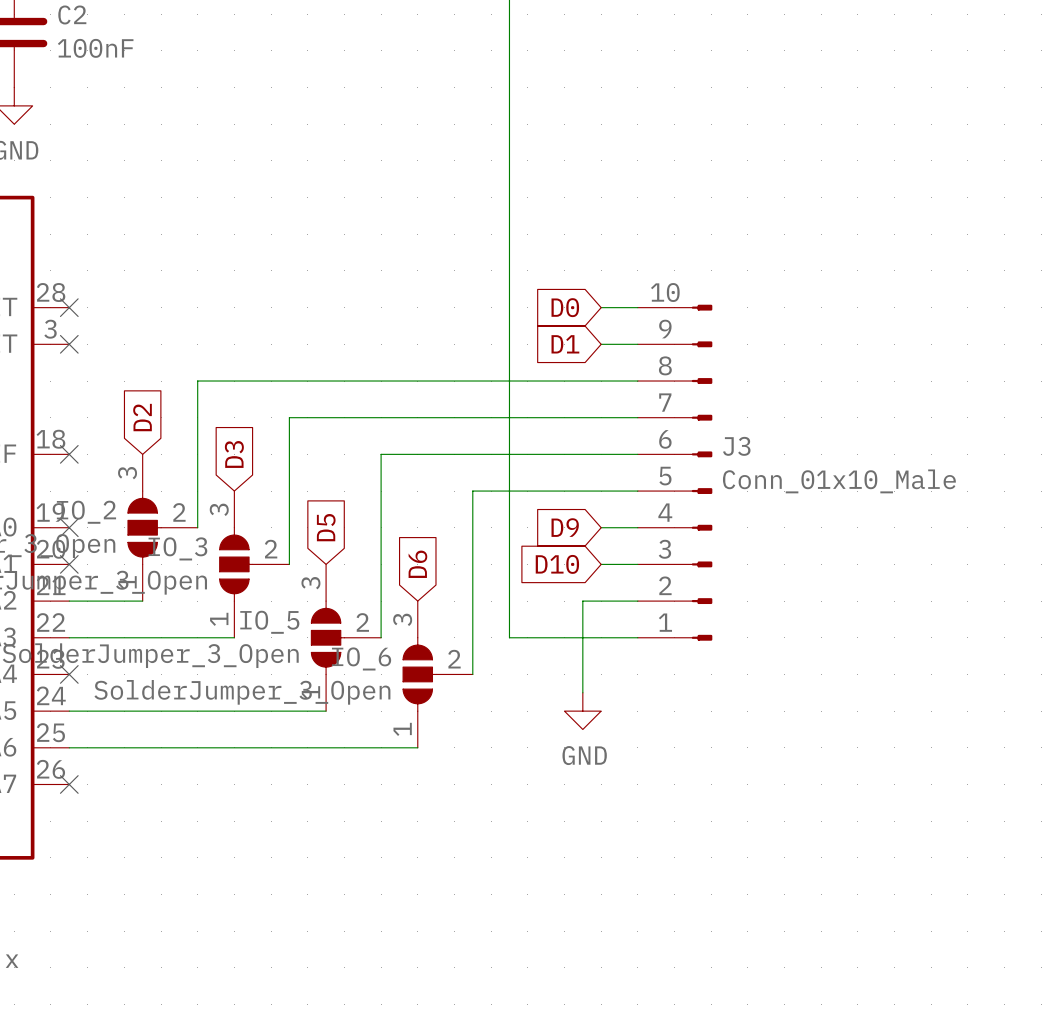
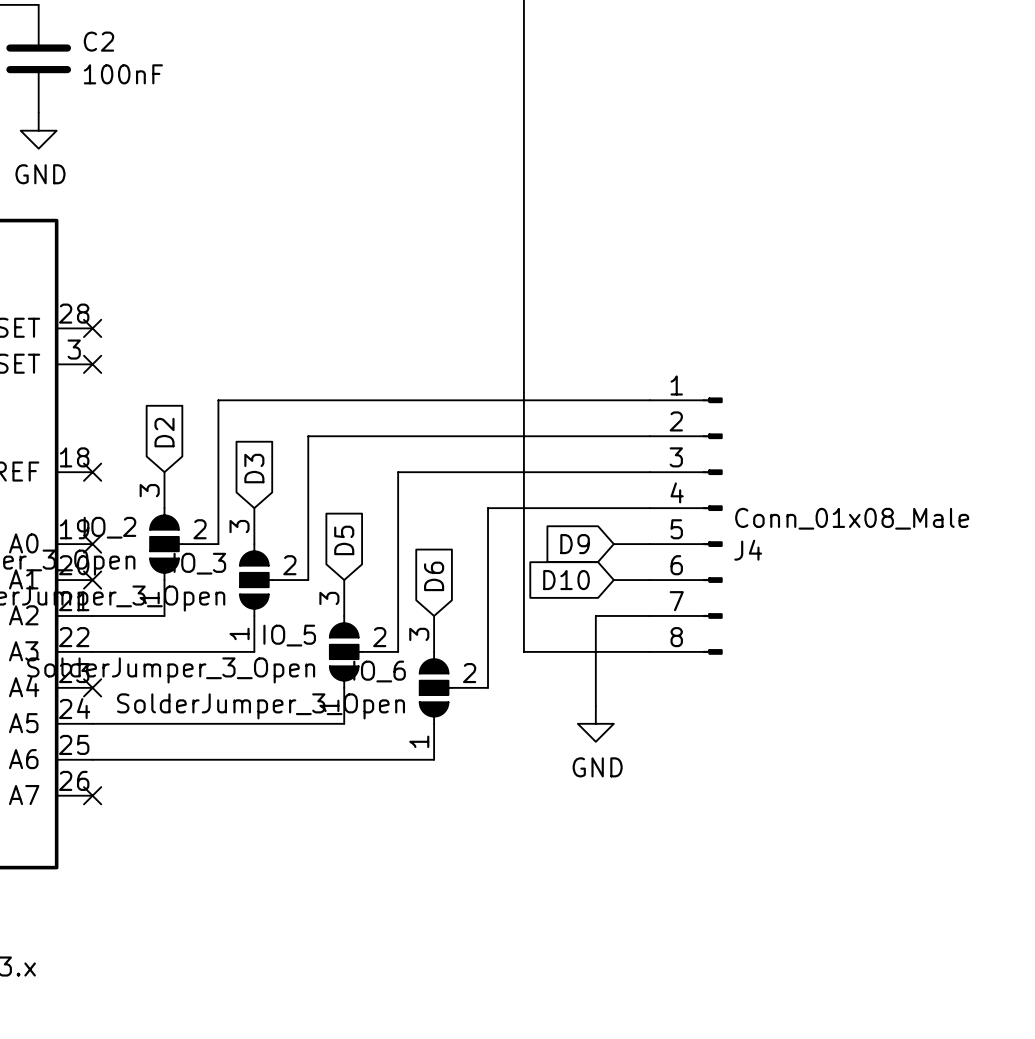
global label: D0 (565, 307) -> none
wire: (601, 307) (637, 307) -> none
global label: D1 (565, 344) -> none
wire: (601, 344) (637, 344) -> none
J3: Conn_01x10_Male (675, 472) -> none
J4: none -> Conn_01x08_Male (686, 526)

